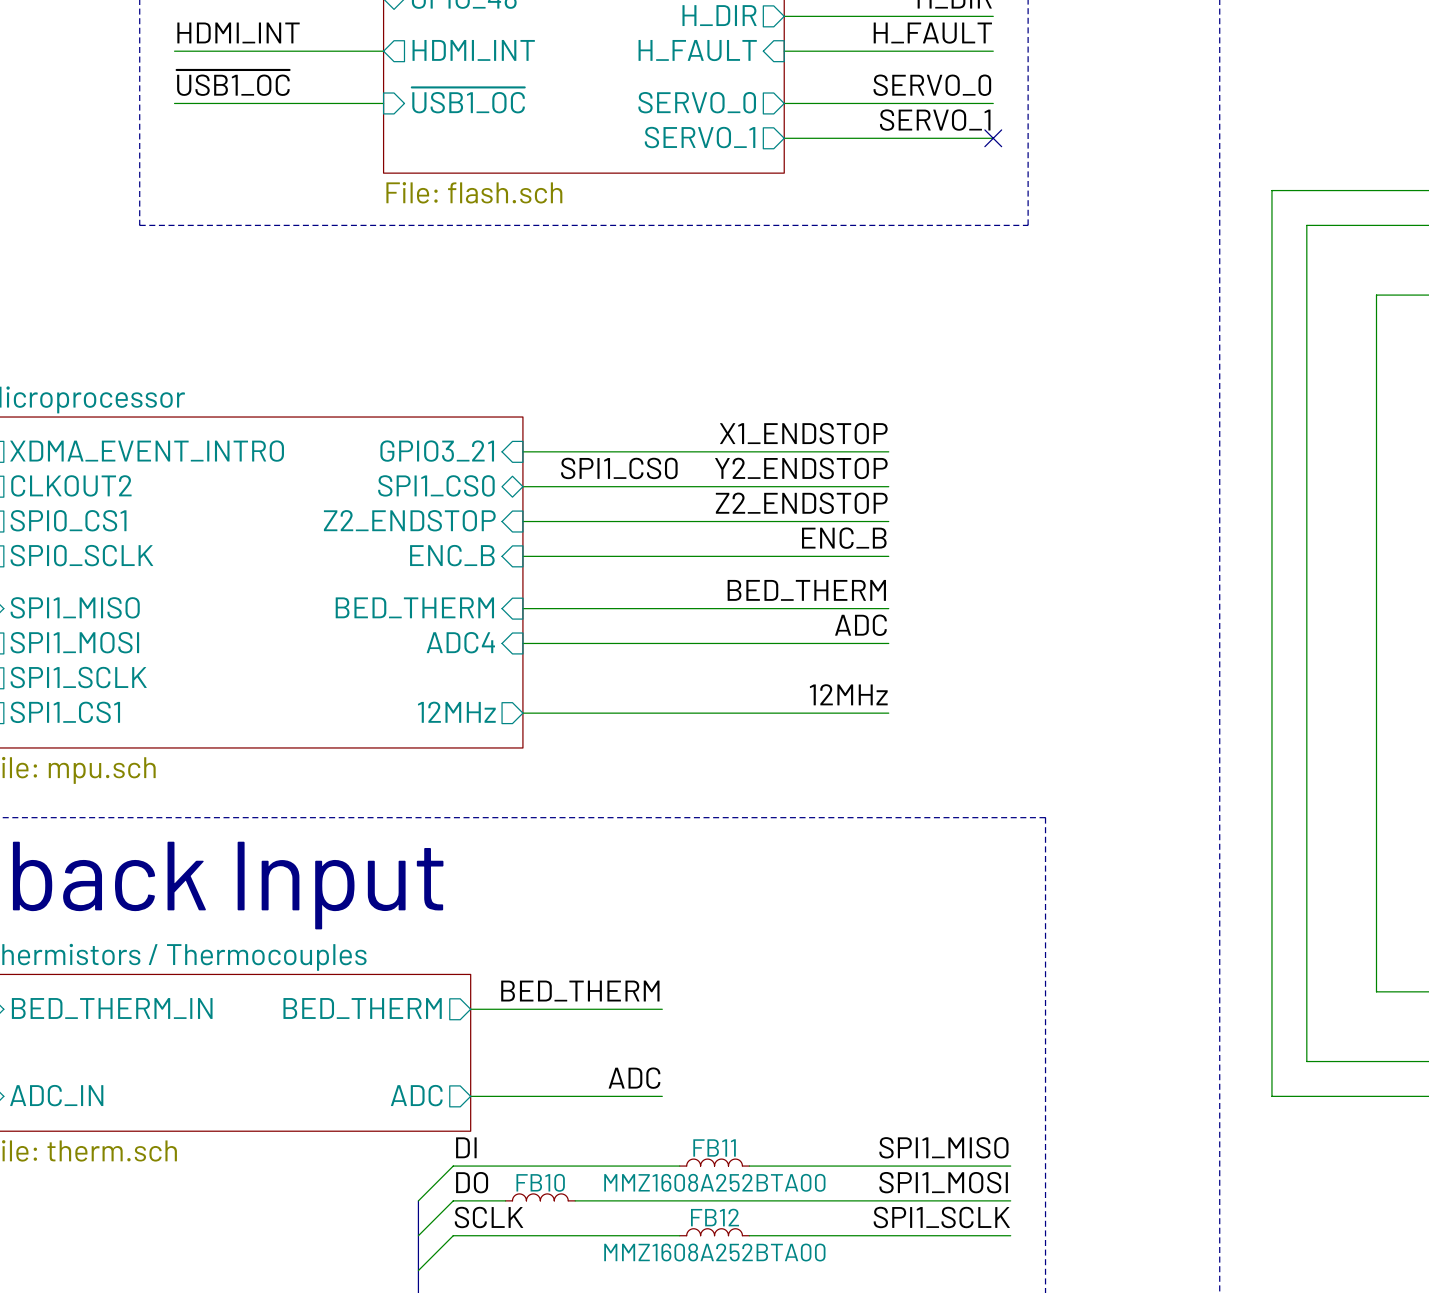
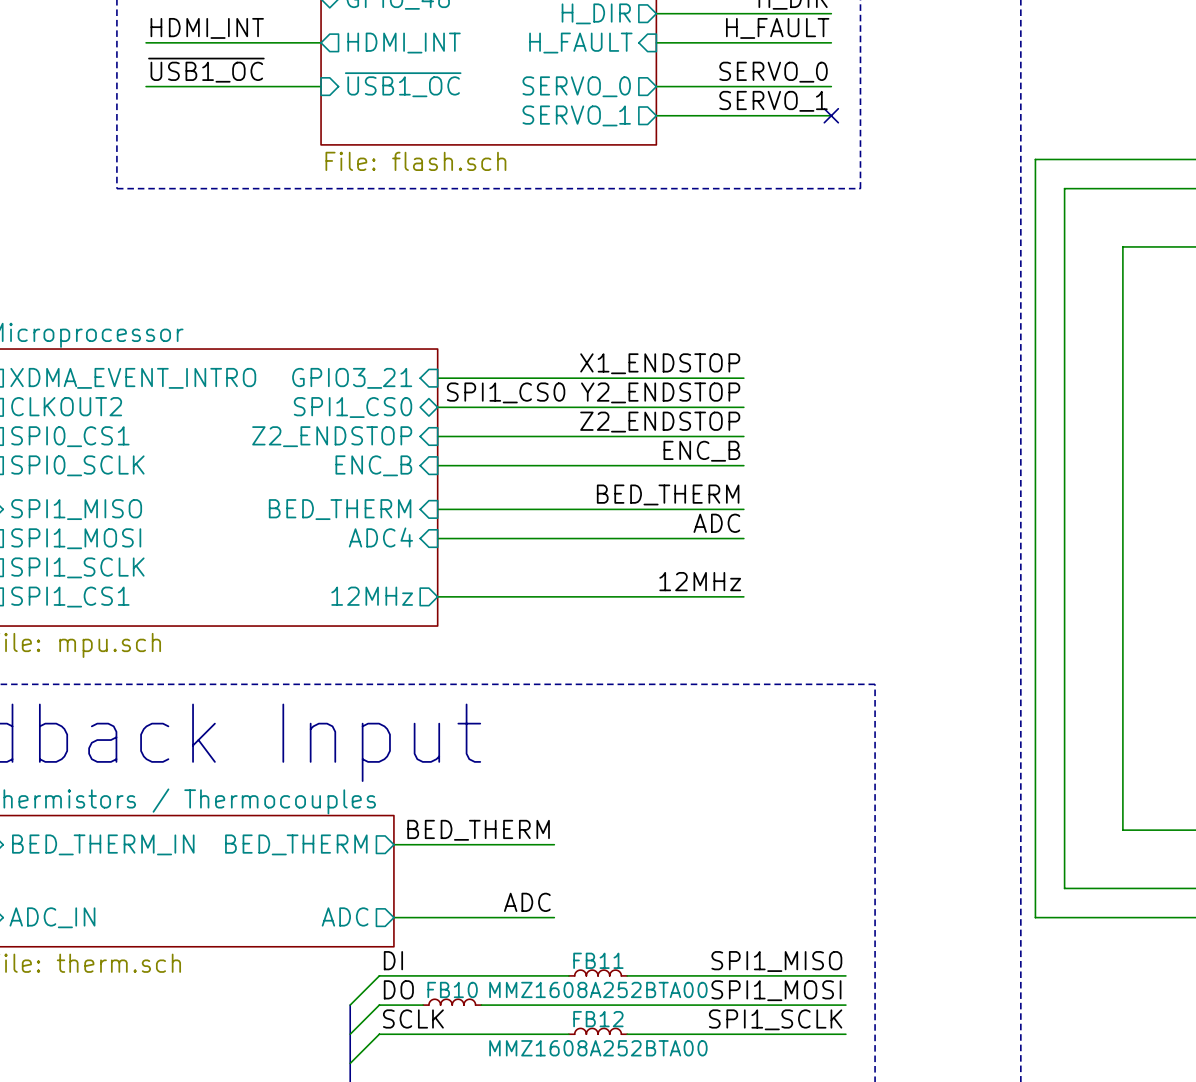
wire: (1271, 190) (1271, 225) -> (1093, 188) (1064, 188)
wire: none -> (1064, 159) (1035, 159) (1035, 917) (1064, 917)
wire: (1306, 225) (1306, 1061) -> none
wire: (1376, 295) (1376, 991) -> (1152, 246) (1122, 246) (1122, 830) (1152, 830)
wire: (1271, 1061) (1271, 1096) -> (1064, 888) (1093, 888)

